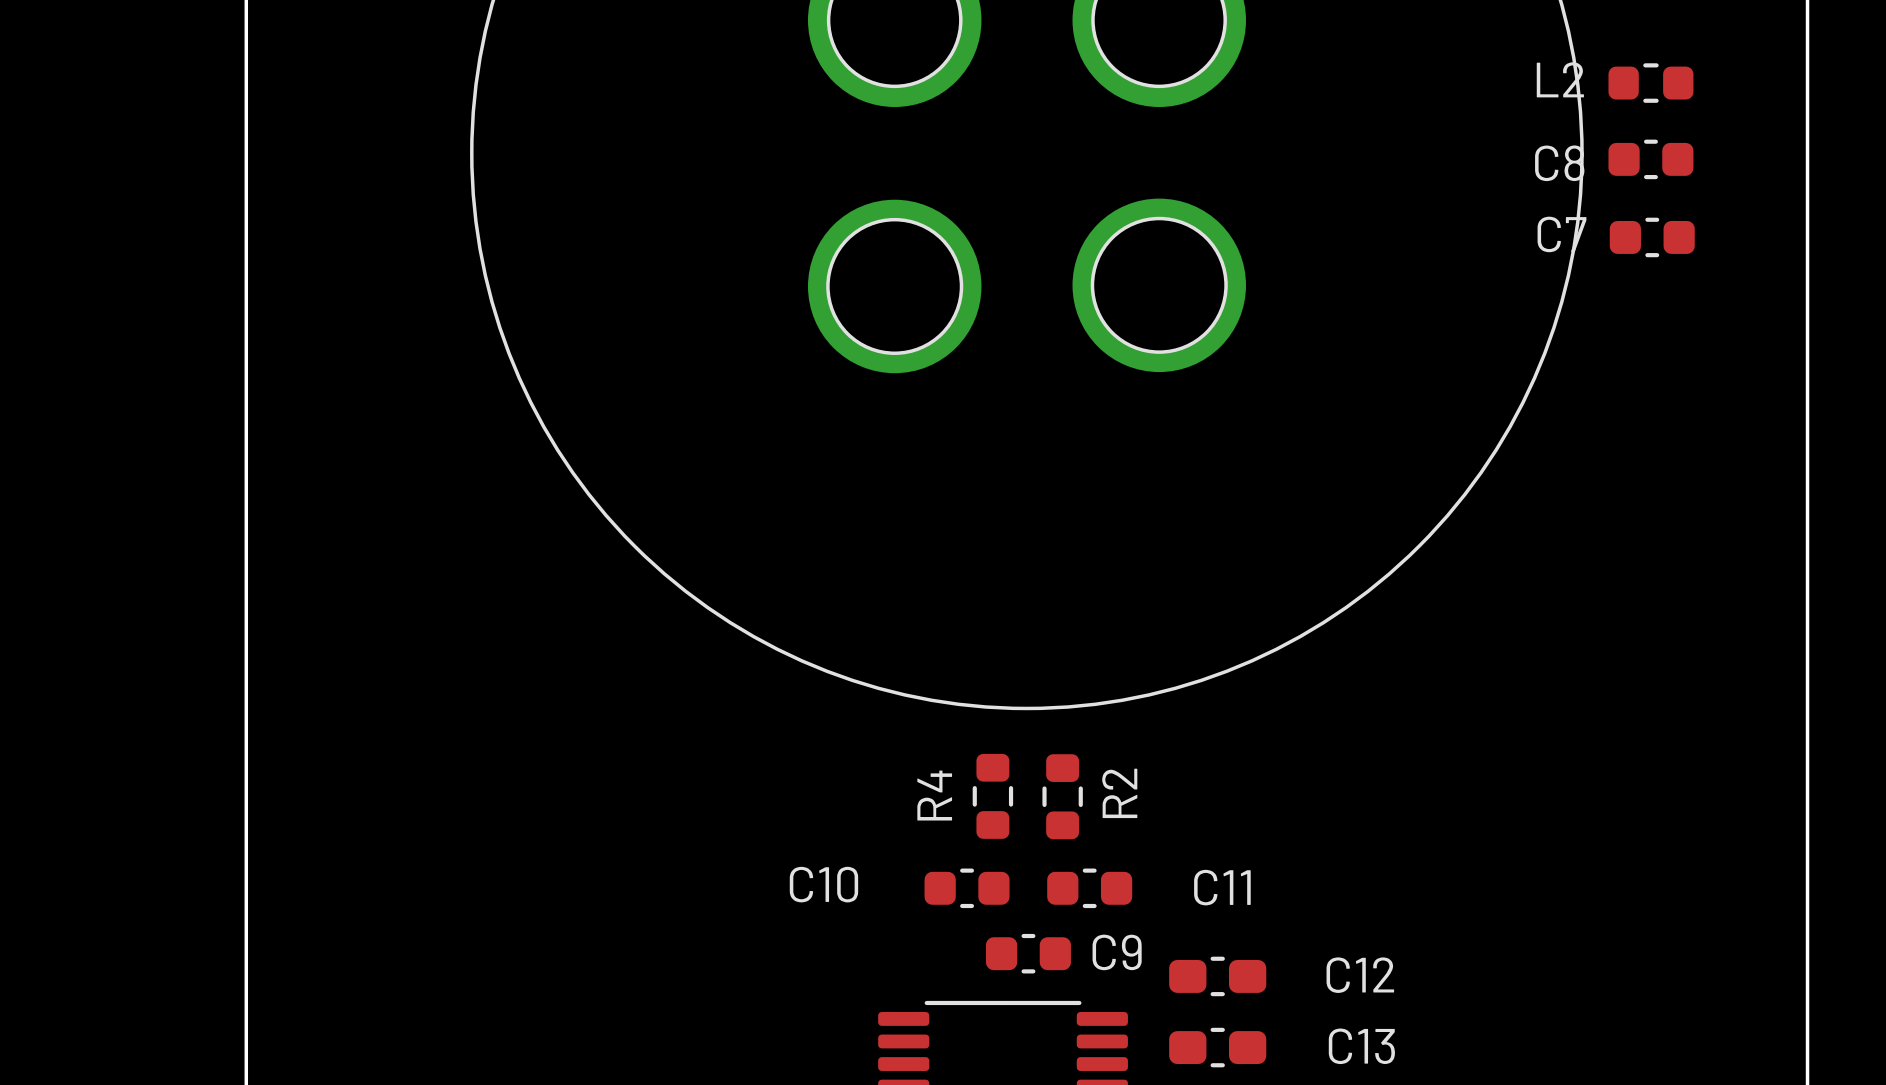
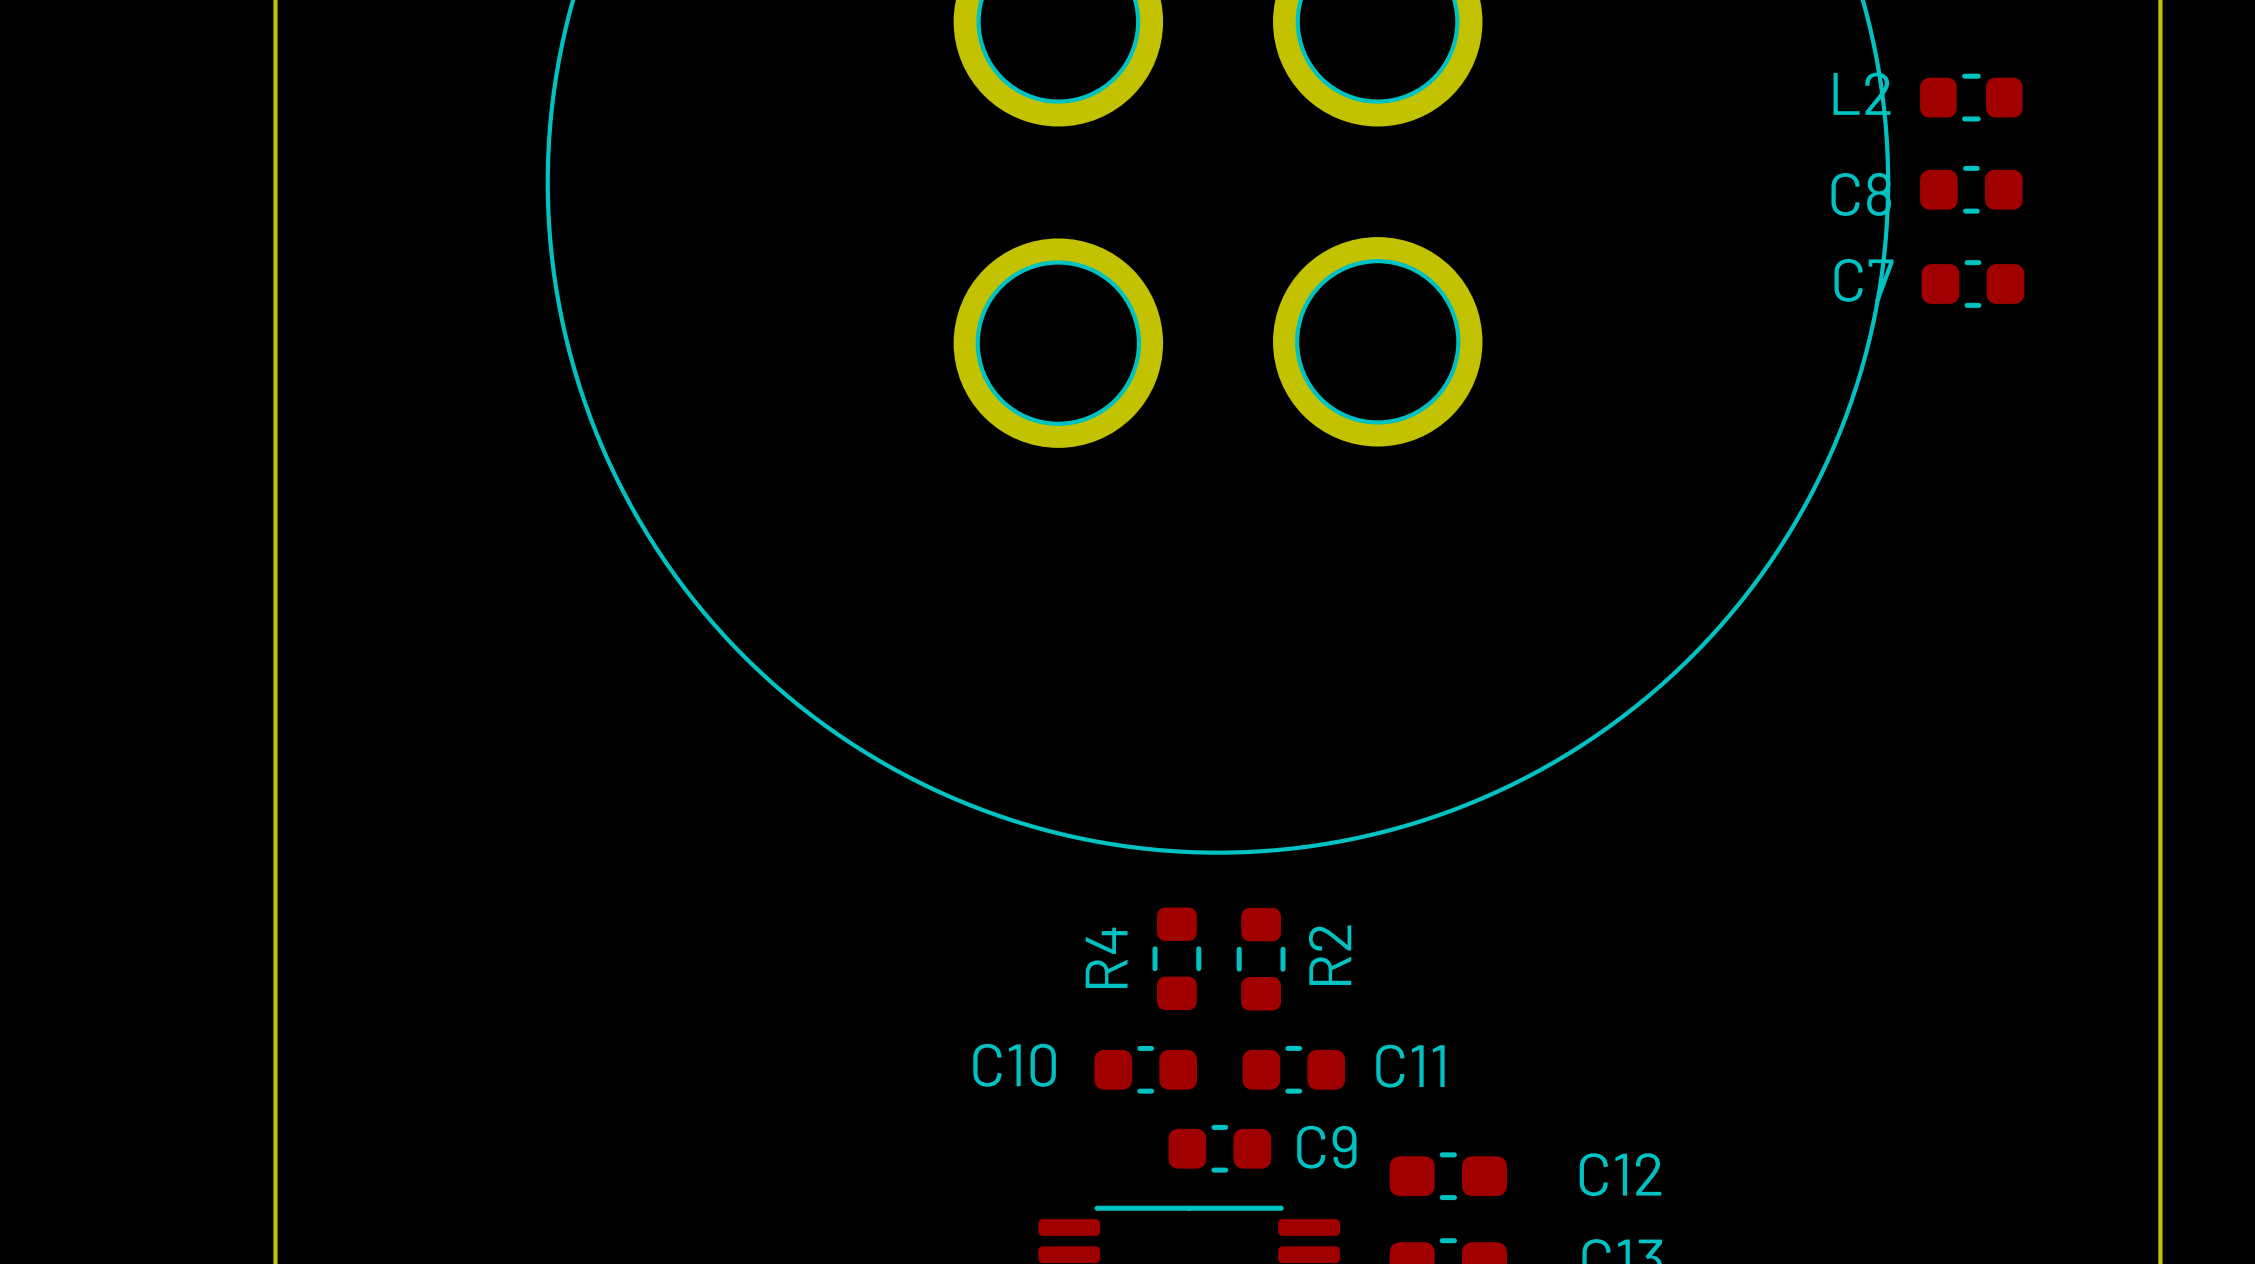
C10 name position: C10 (823, 884) -> C10 (1014, 1065)
C11 name position: C11 (1222, 887) -> C11 (1410, 1066)

